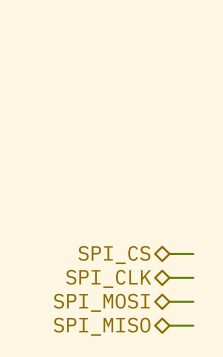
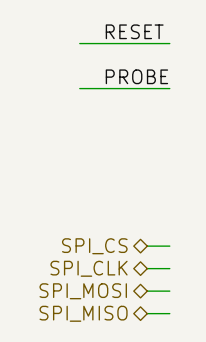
label: none -> RESET (134, 31)
wire: none -> (79, 43) (169, 43)
label: none -> PROBE (136, 76)
wire: none -> (79, 88) (169, 88)

